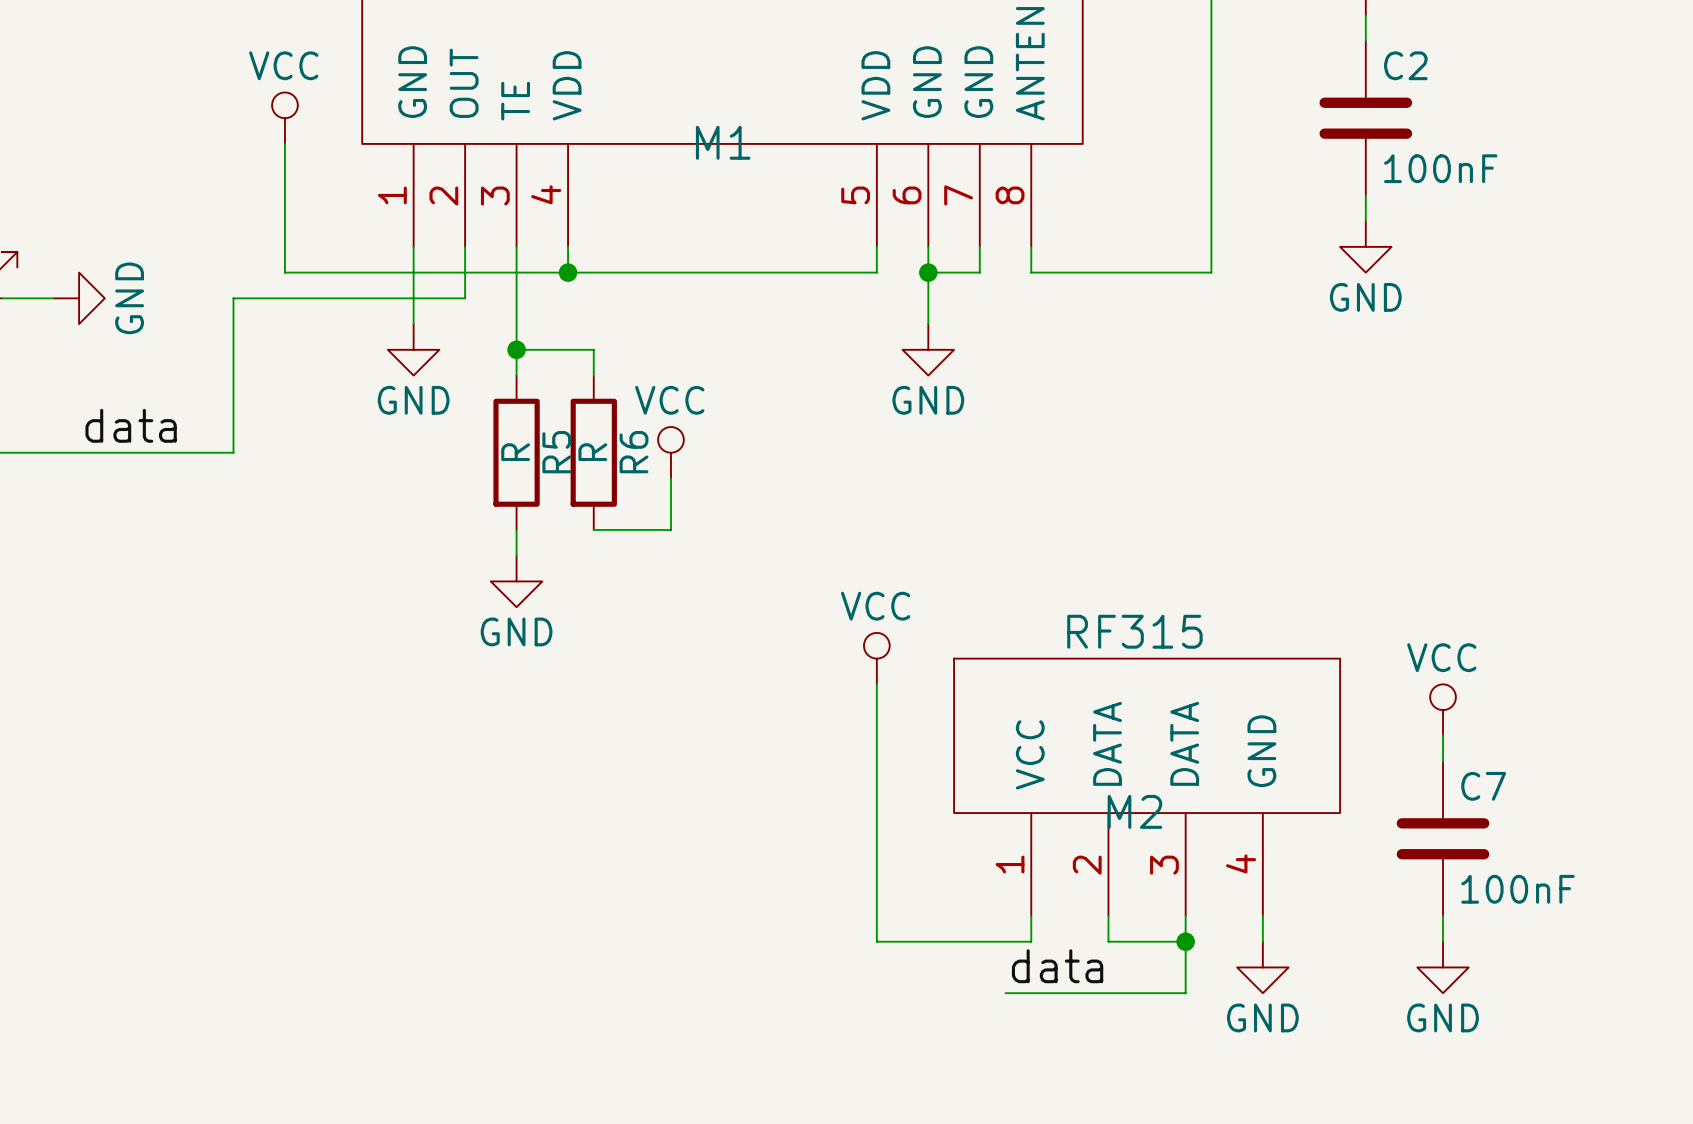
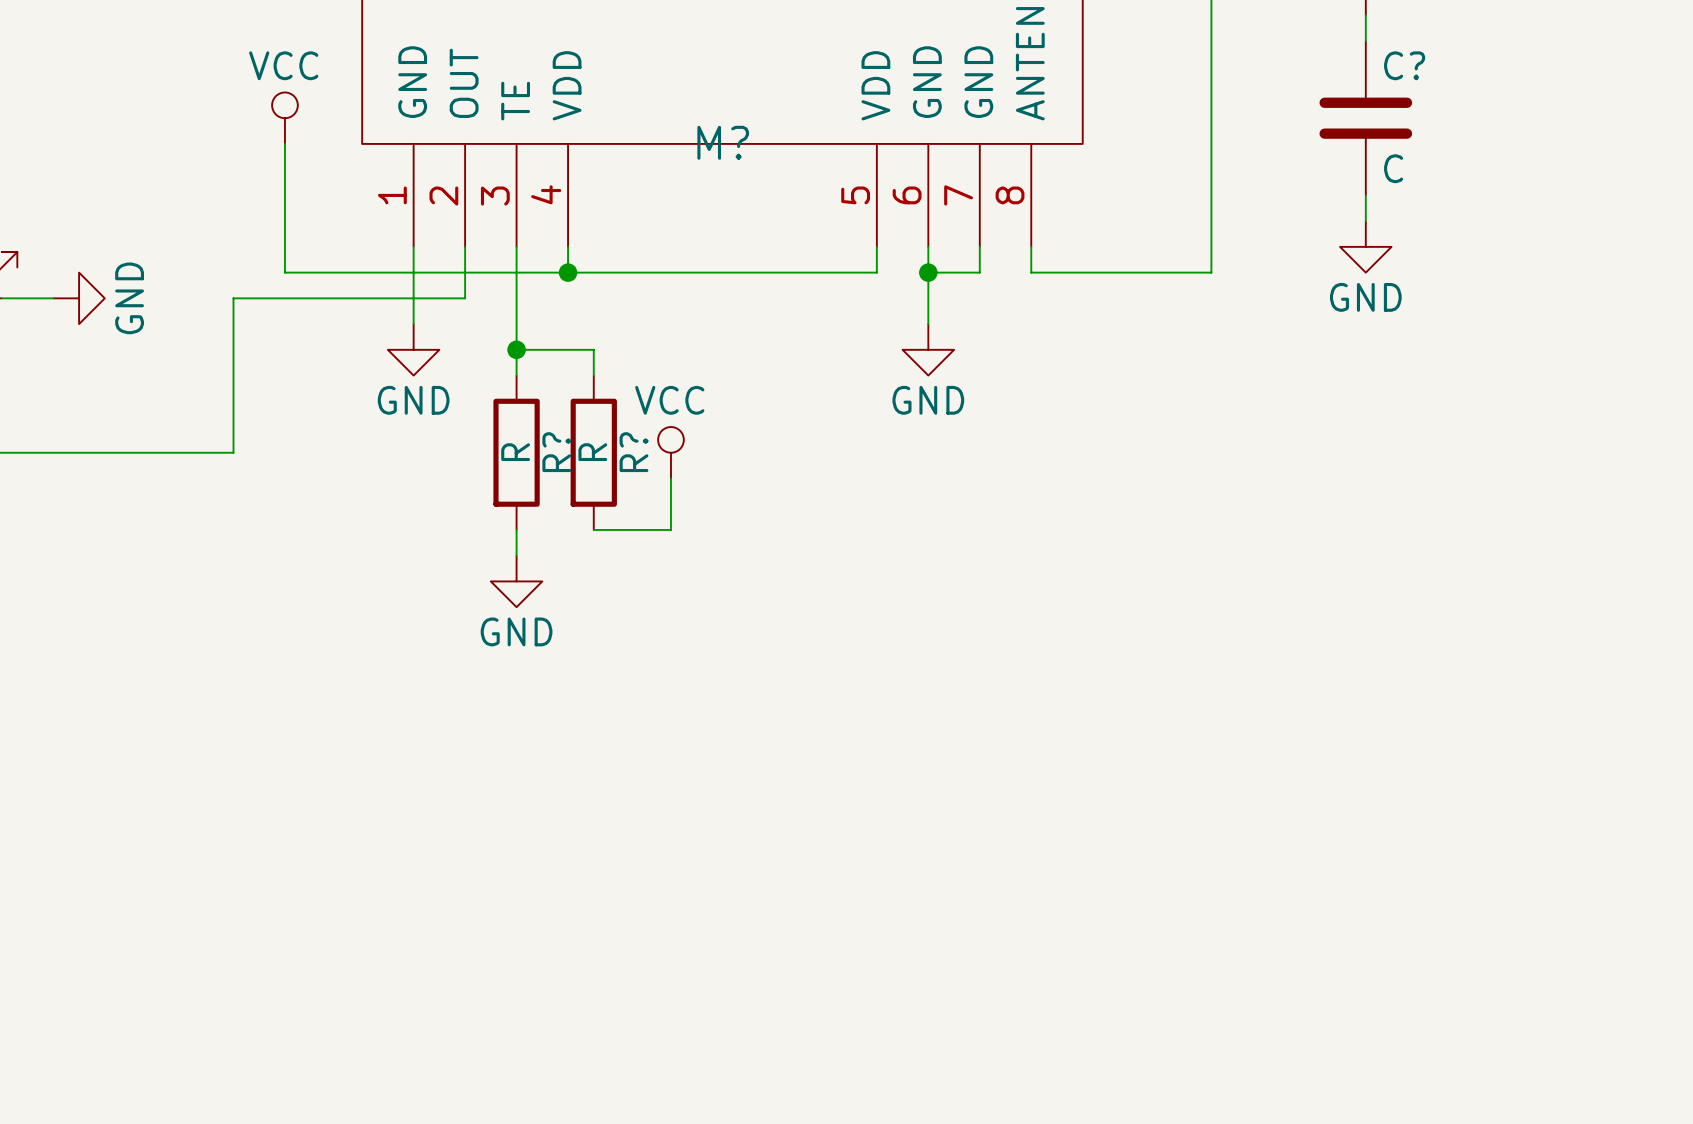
C2 name: C2 (1405, 65) -> C? (1404, 65)
M1 name: M1 (723, 142) -> M? (723, 142)
C2 value: 100nF (1440, 168) -> C (1393, 168)
label: data (131, 425) -> none
R5 name: R5 (556, 452) -> R? (556, 452)
R6 name: R6 (633, 452) -> R? (633, 452)
power symbol: VCC (876, 658) -> none
wire: (876, 684) (876, 941) (1031, 941) (1031, 915) -> none
power symbol: VCC (1443, 710) -> none
wire: (1443, 735) (1443, 761) -> none
M2: RF315 (1147, 787) -> none
C7: 100nF (1443, 838) -> none
wire: (1108, 915) (1108, 941) (1185, 941) -> none
wire: (1185, 915) (1185, 993) (1005, 993) -> none
wire: (1262, 915) (1262, 941) -> none
wire: (1443, 915) (1443, 941) -> none
junction: (1185, 941) -> none
label: data (1057, 966) -> none
power symbol: GND (1262, 967) -> none
power symbol: GND (1443, 967) -> none

